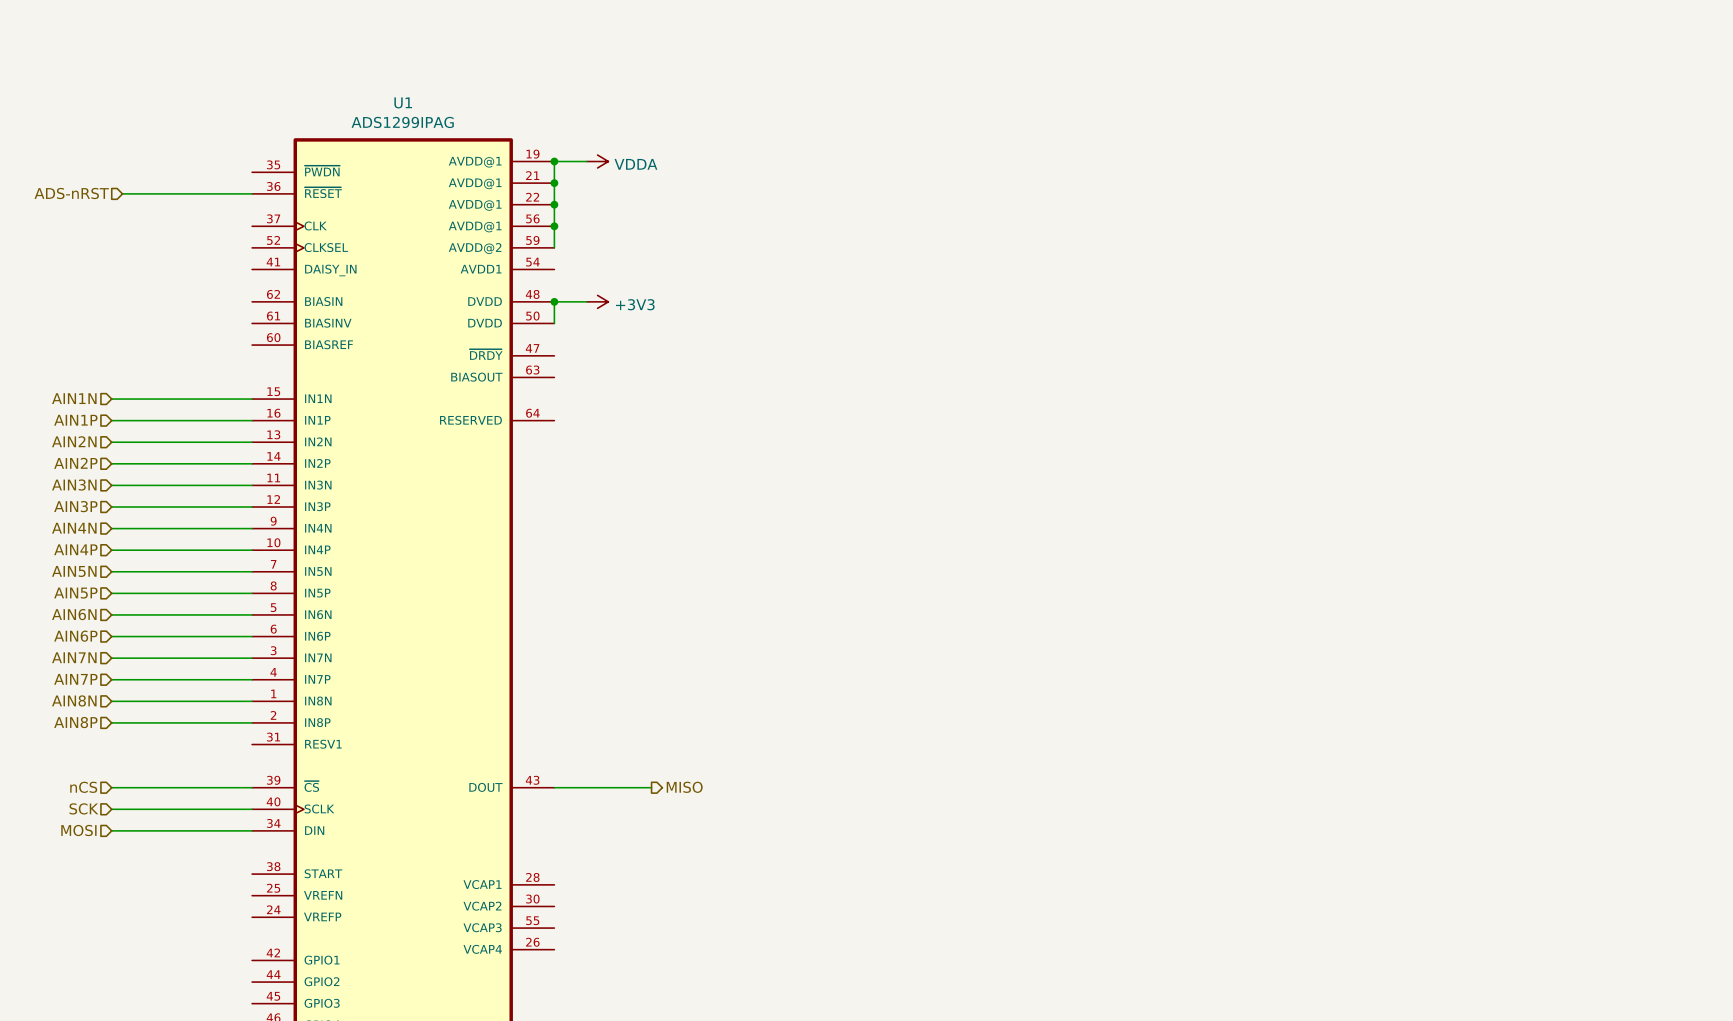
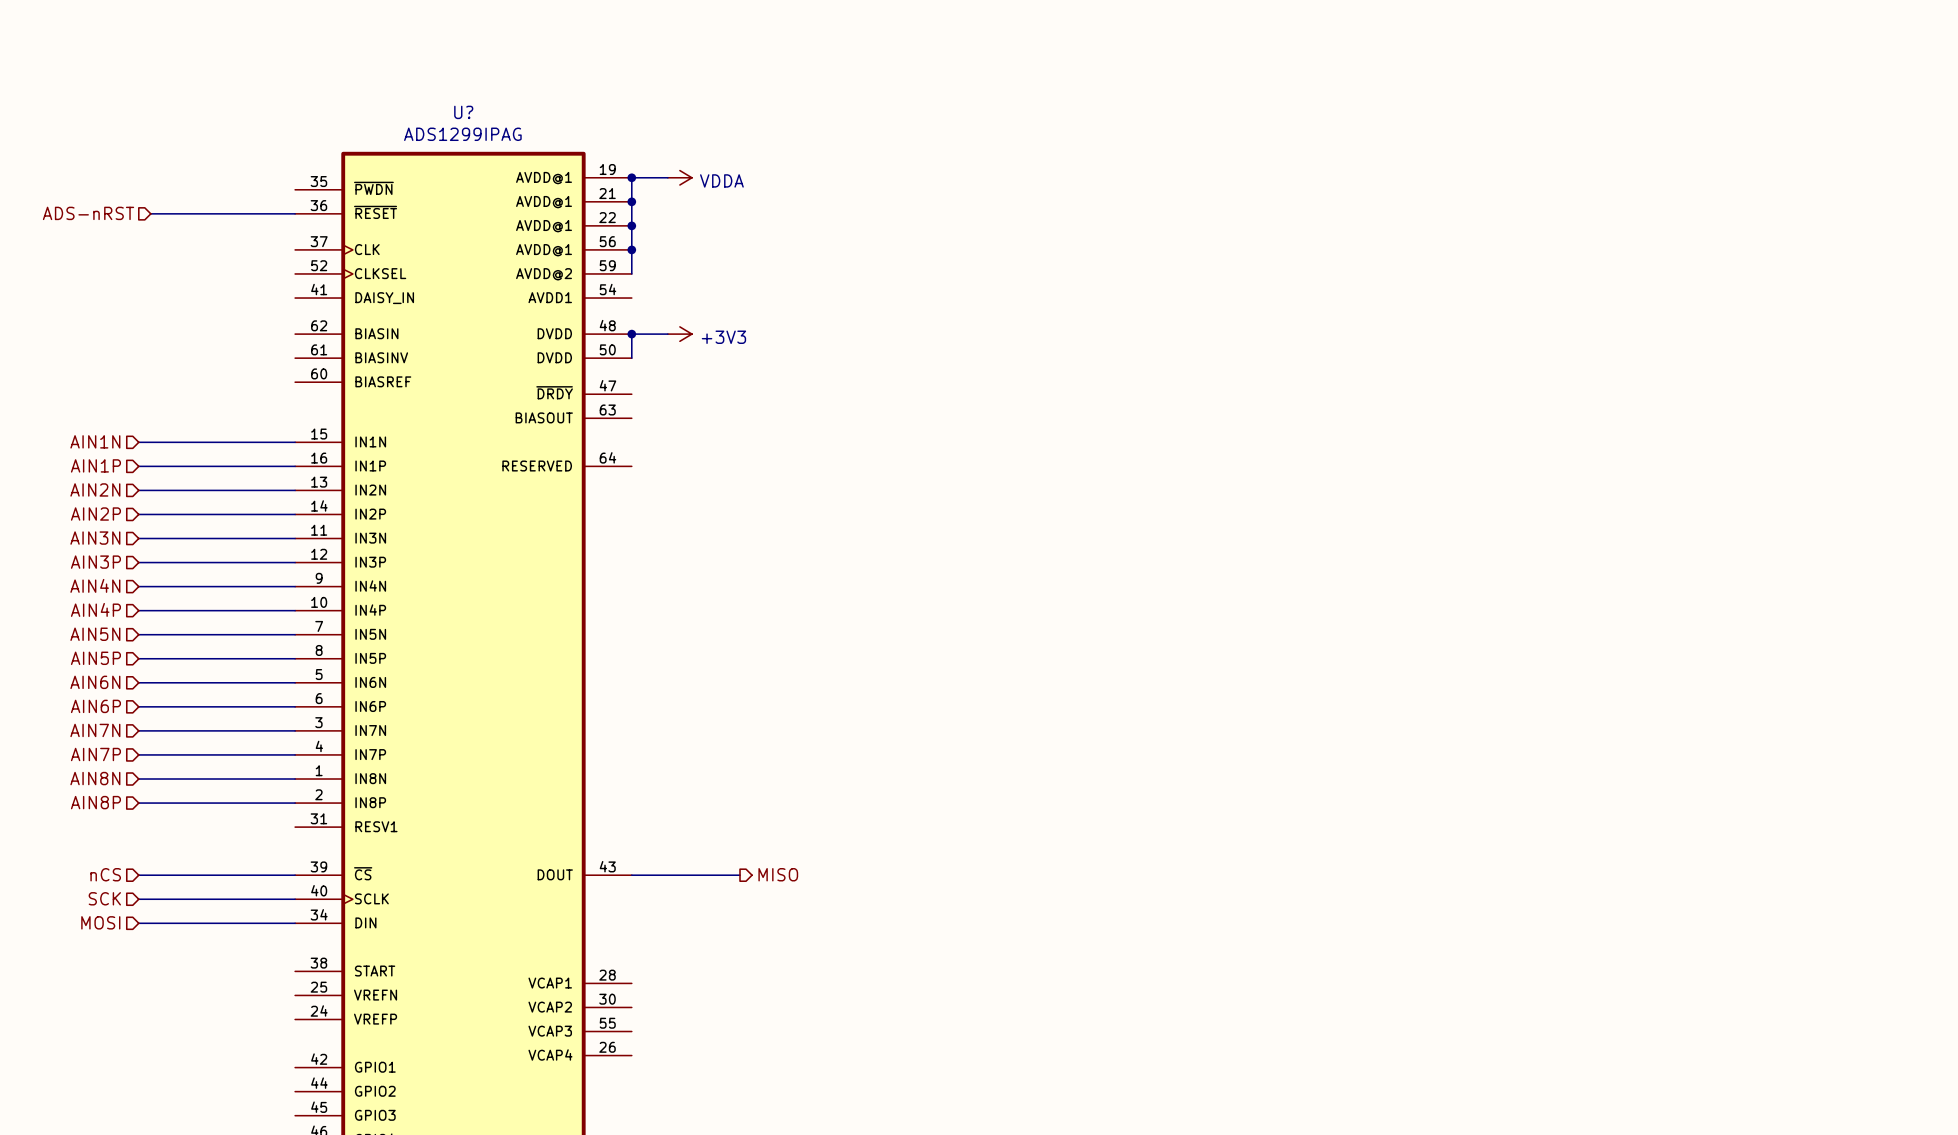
U1 name: U1 (403, 102) -> U? (463, 112)

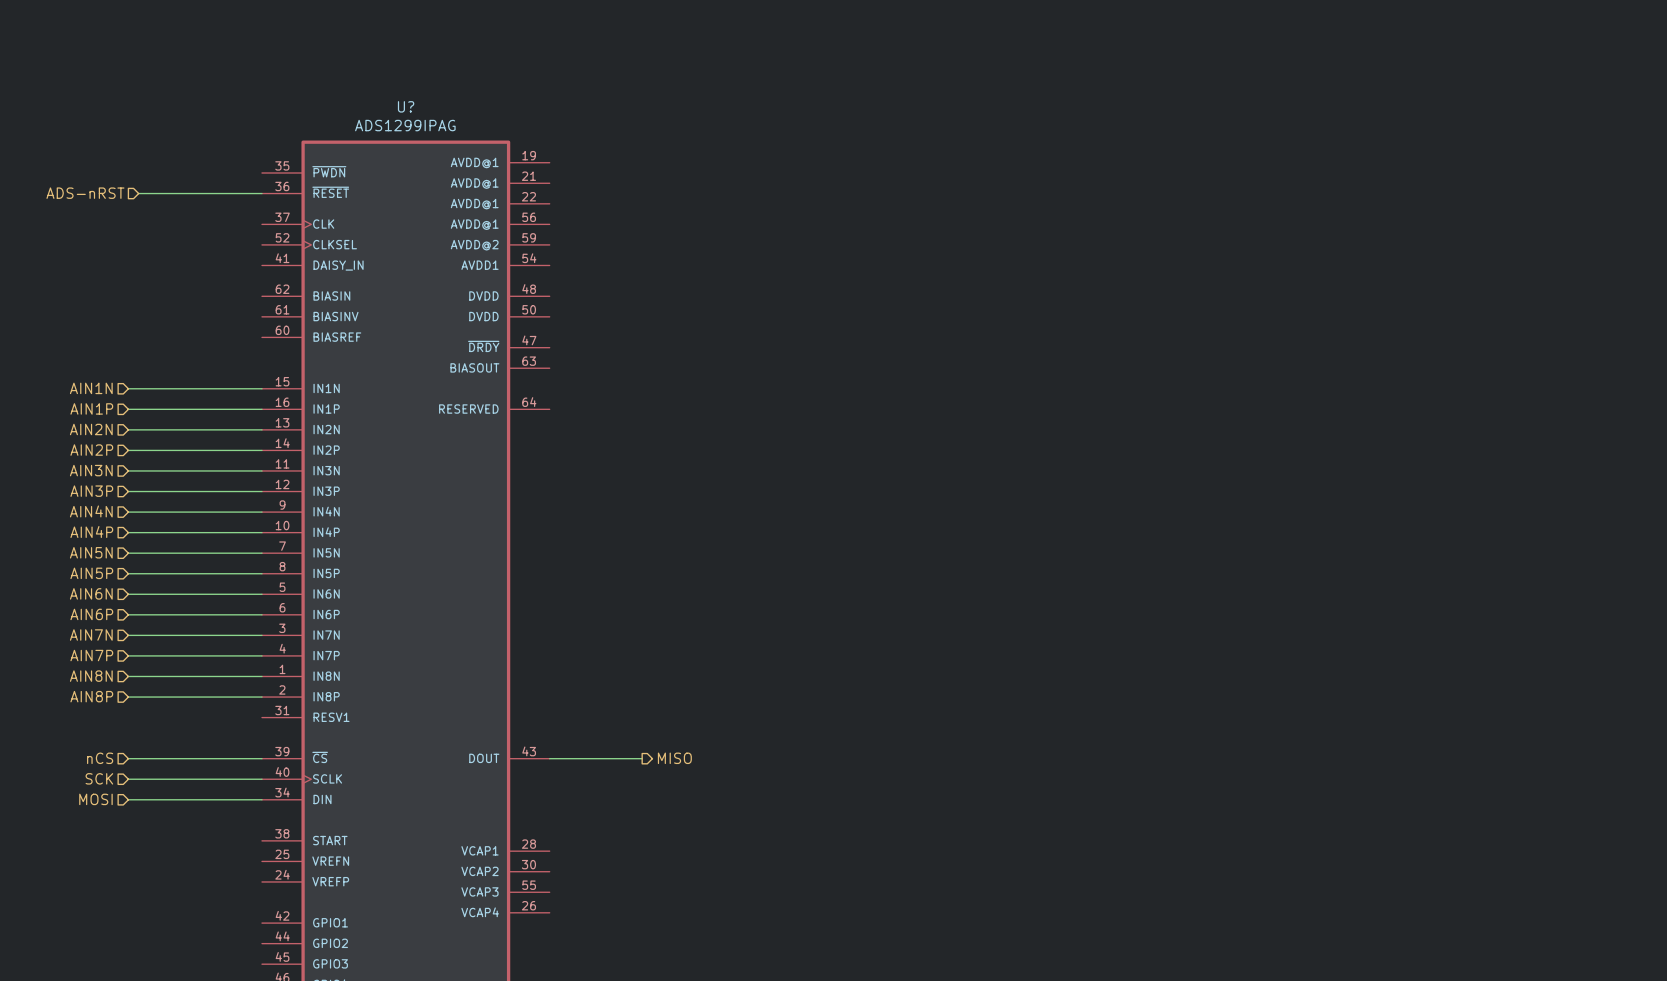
junction: (631, 177) -> none
wire: (667, 177) (631, 177) (631, 273) -> none
power symbol: VDDA (679, 177) -> none
junction: (631, 201) -> none
junction: (631, 225) -> none
junction: (631, 249) -> none
junction: (631, 334) -> none
wire: (667, 334) (631, 334) (631, 358) -> none
power symbol: +3V3 (679, 334) -> none

